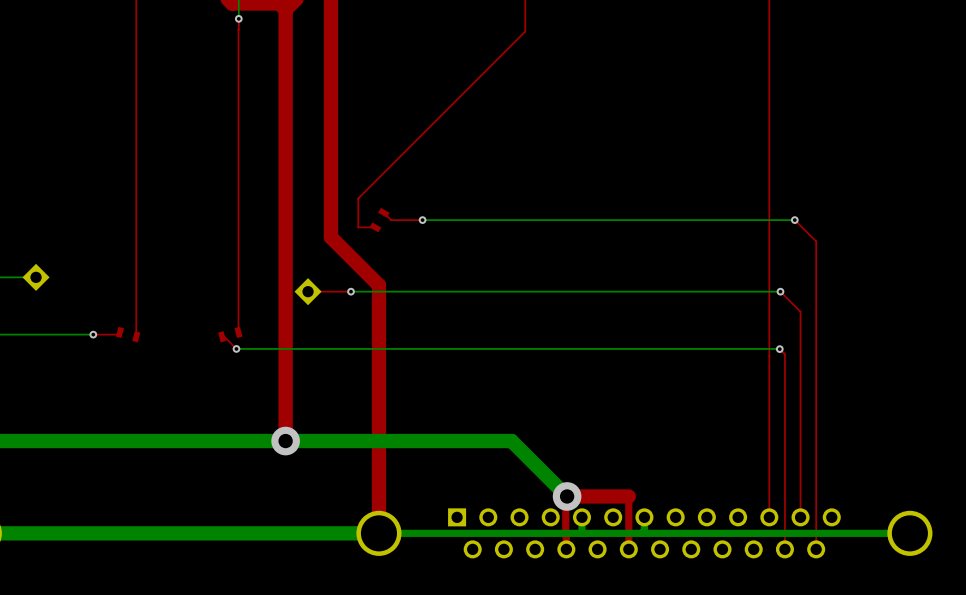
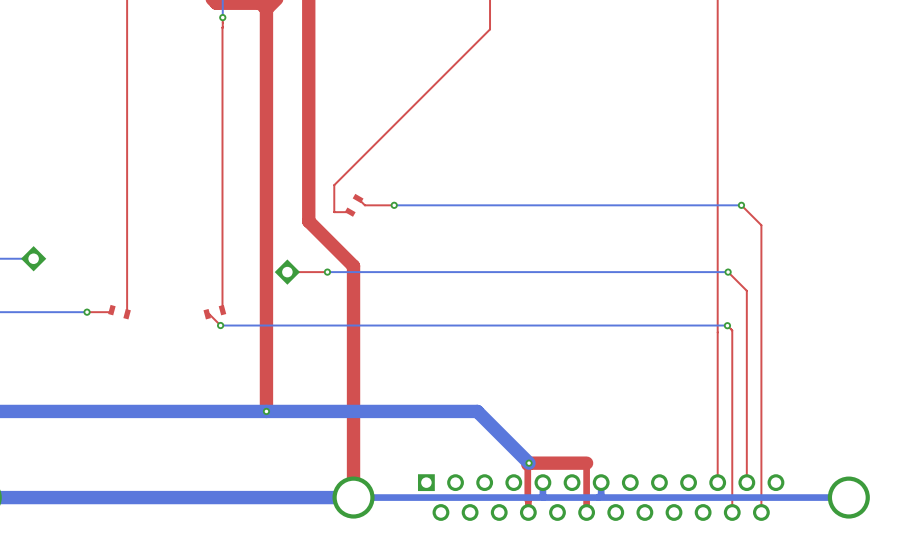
via size: [271, 426, 300, 456] -> [262, 407, 271, 416]
via size: [552, 482, 582, 511] -> [525, 459, 533, 467]

